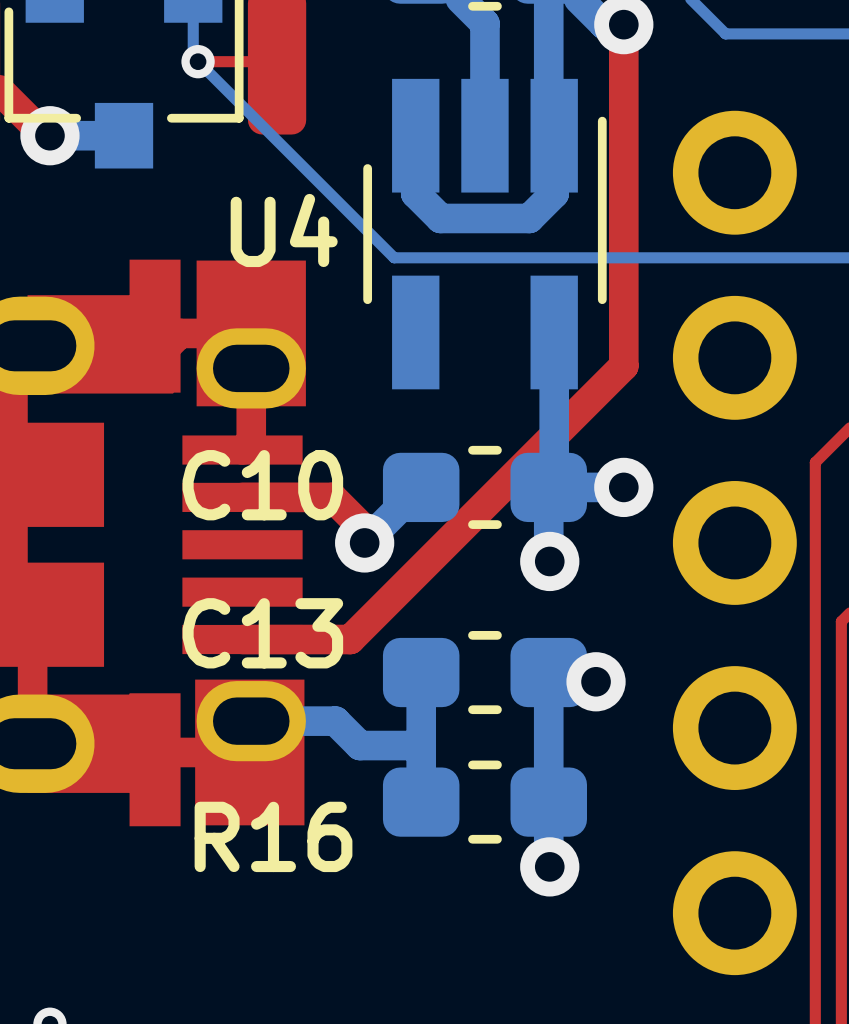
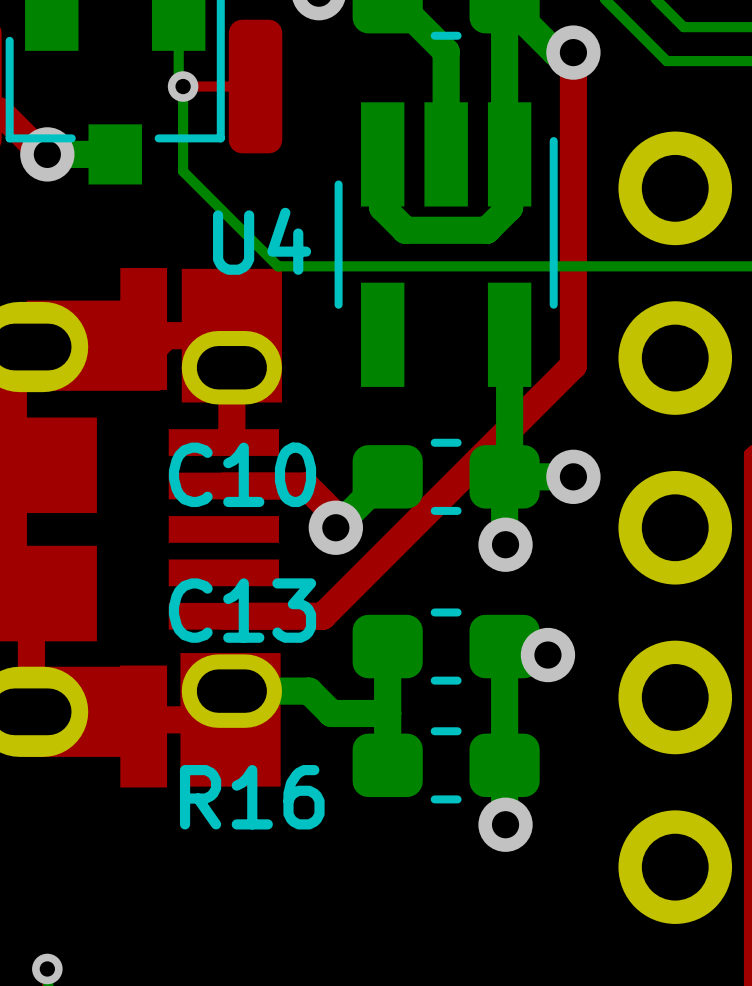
bottom track: (198, 61) (394, 257) -> (183, 86) (183, 171) (278, 266) (362, 266)

